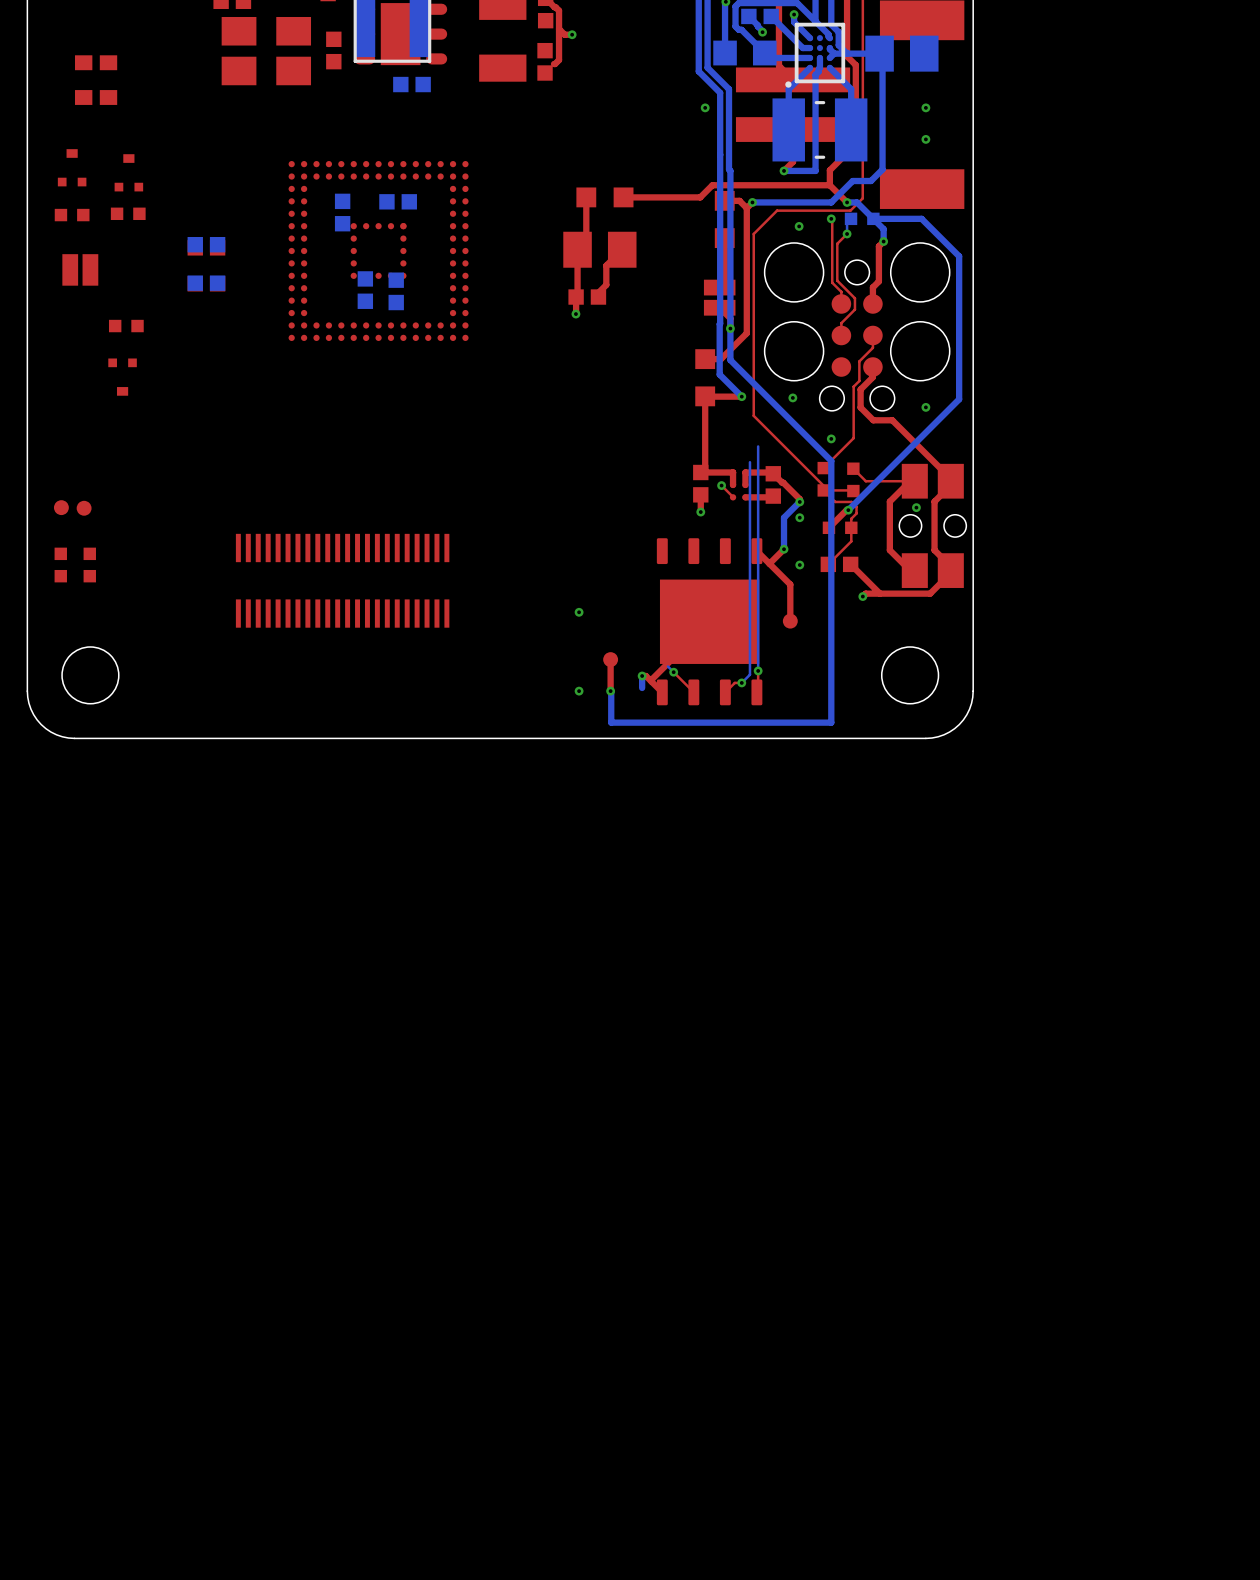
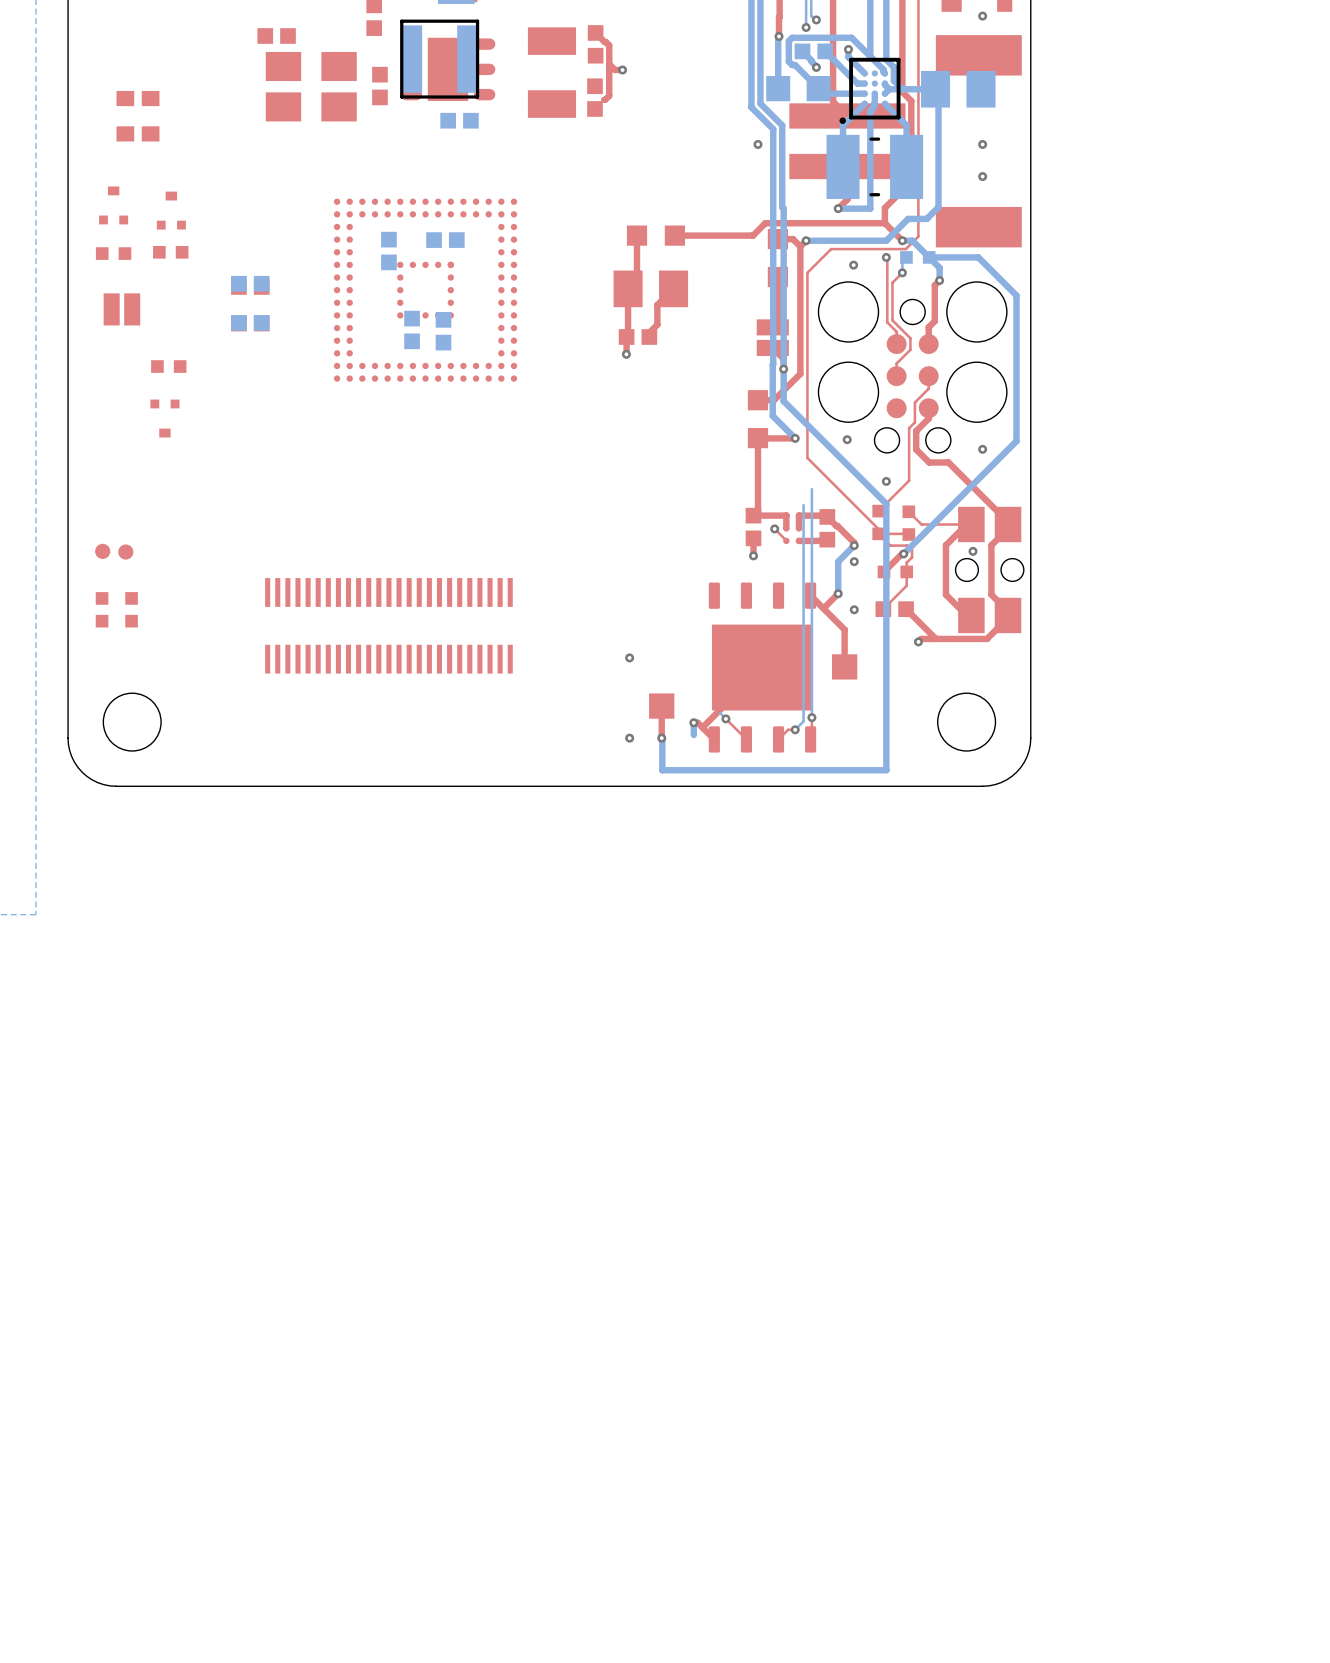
part footprint: [235, 533, 450, 628] -> [265, 578, 513, 674]
part footprint: [782, 613, 798, 629] -> [832, 654, 858, 680]
part footprint: [603, 652, 619, 668] -> [649, 693, 675, 719]

